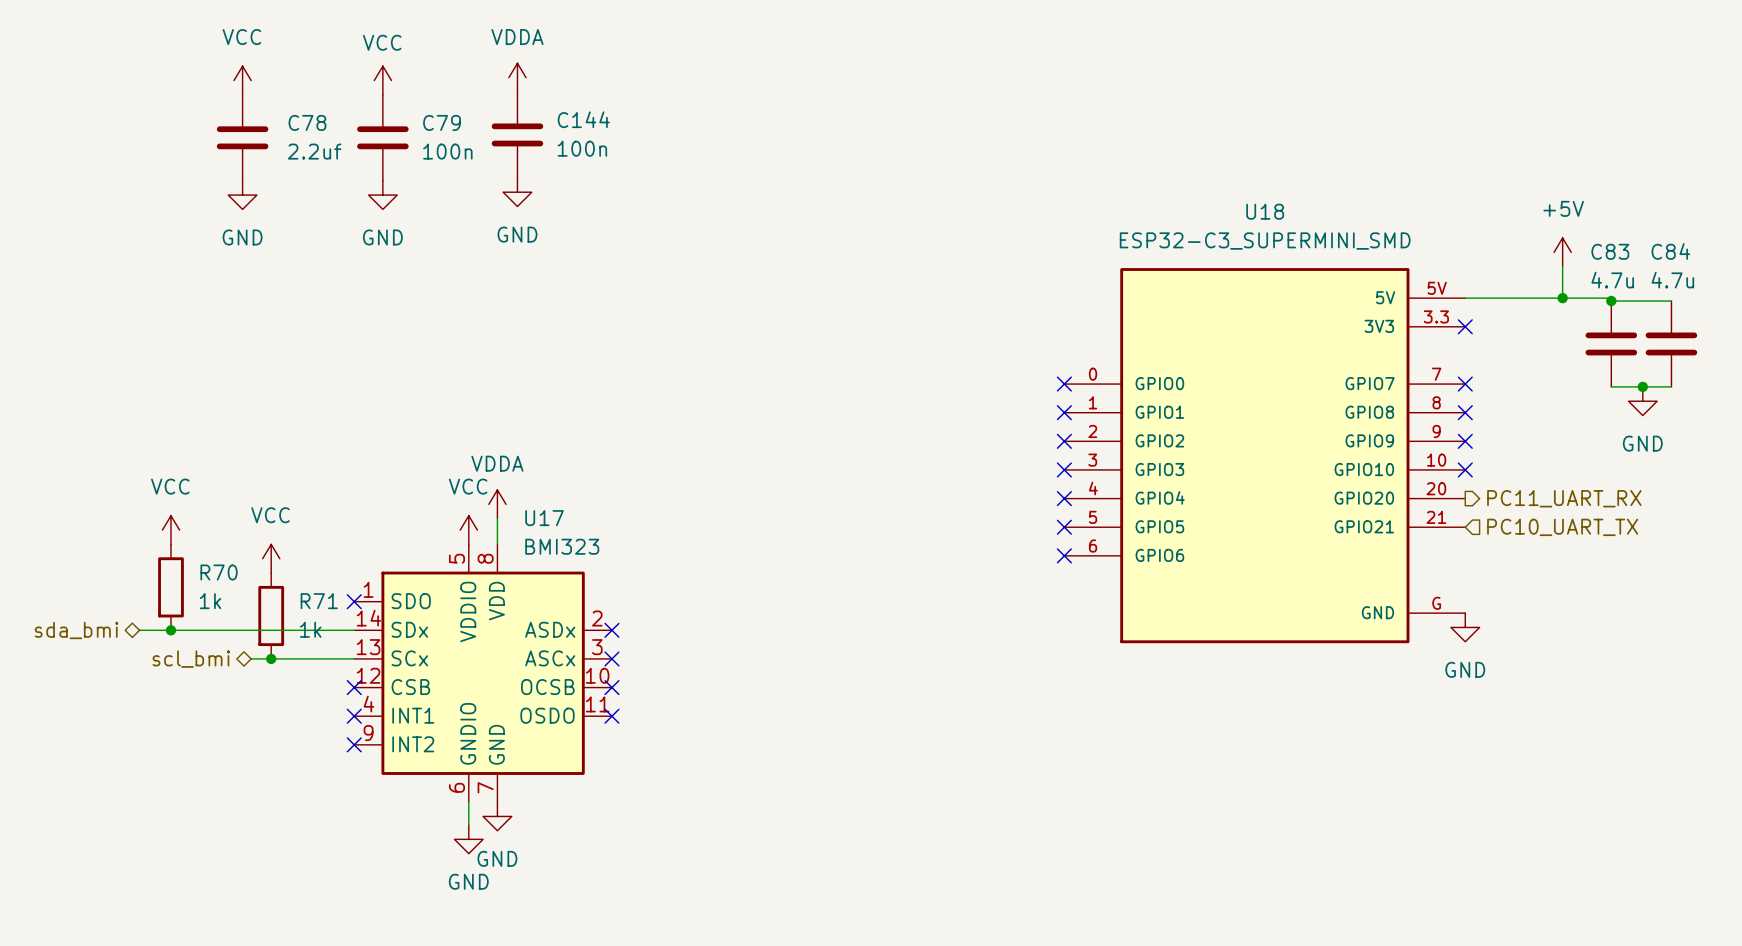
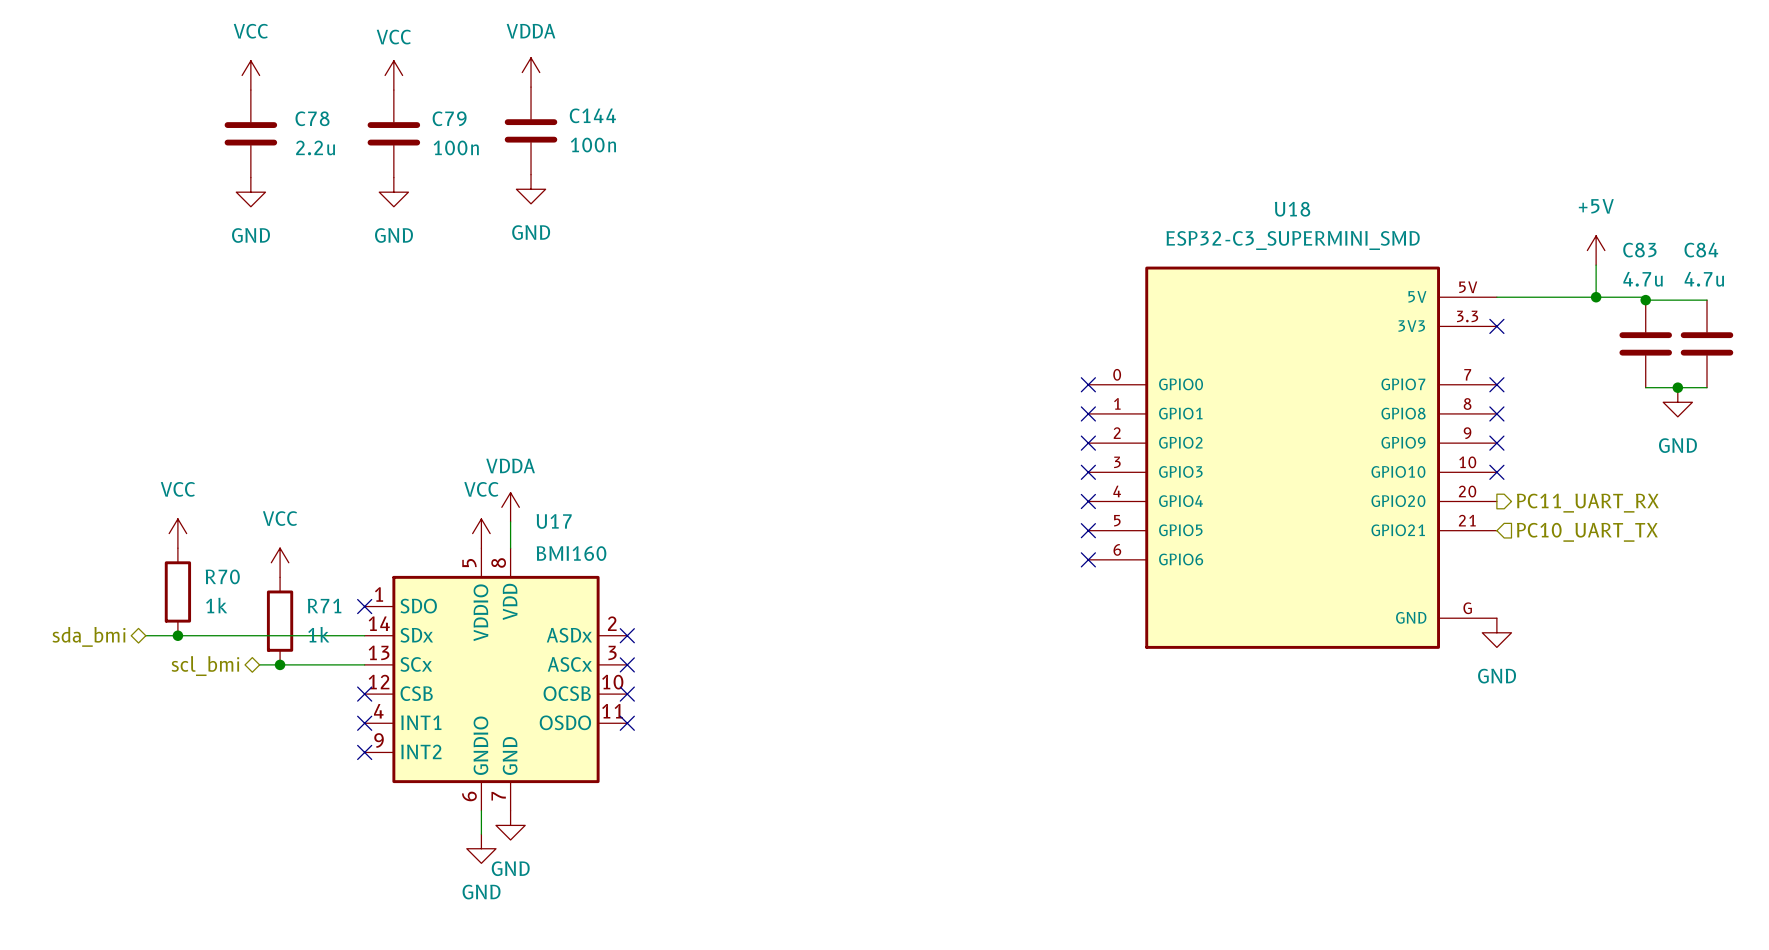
C78 value: 2.2uf (314, 151) -> 2.2u (315, 147)
U17 value: BMI323 (562, 546) -> BMI160 (571, 553)

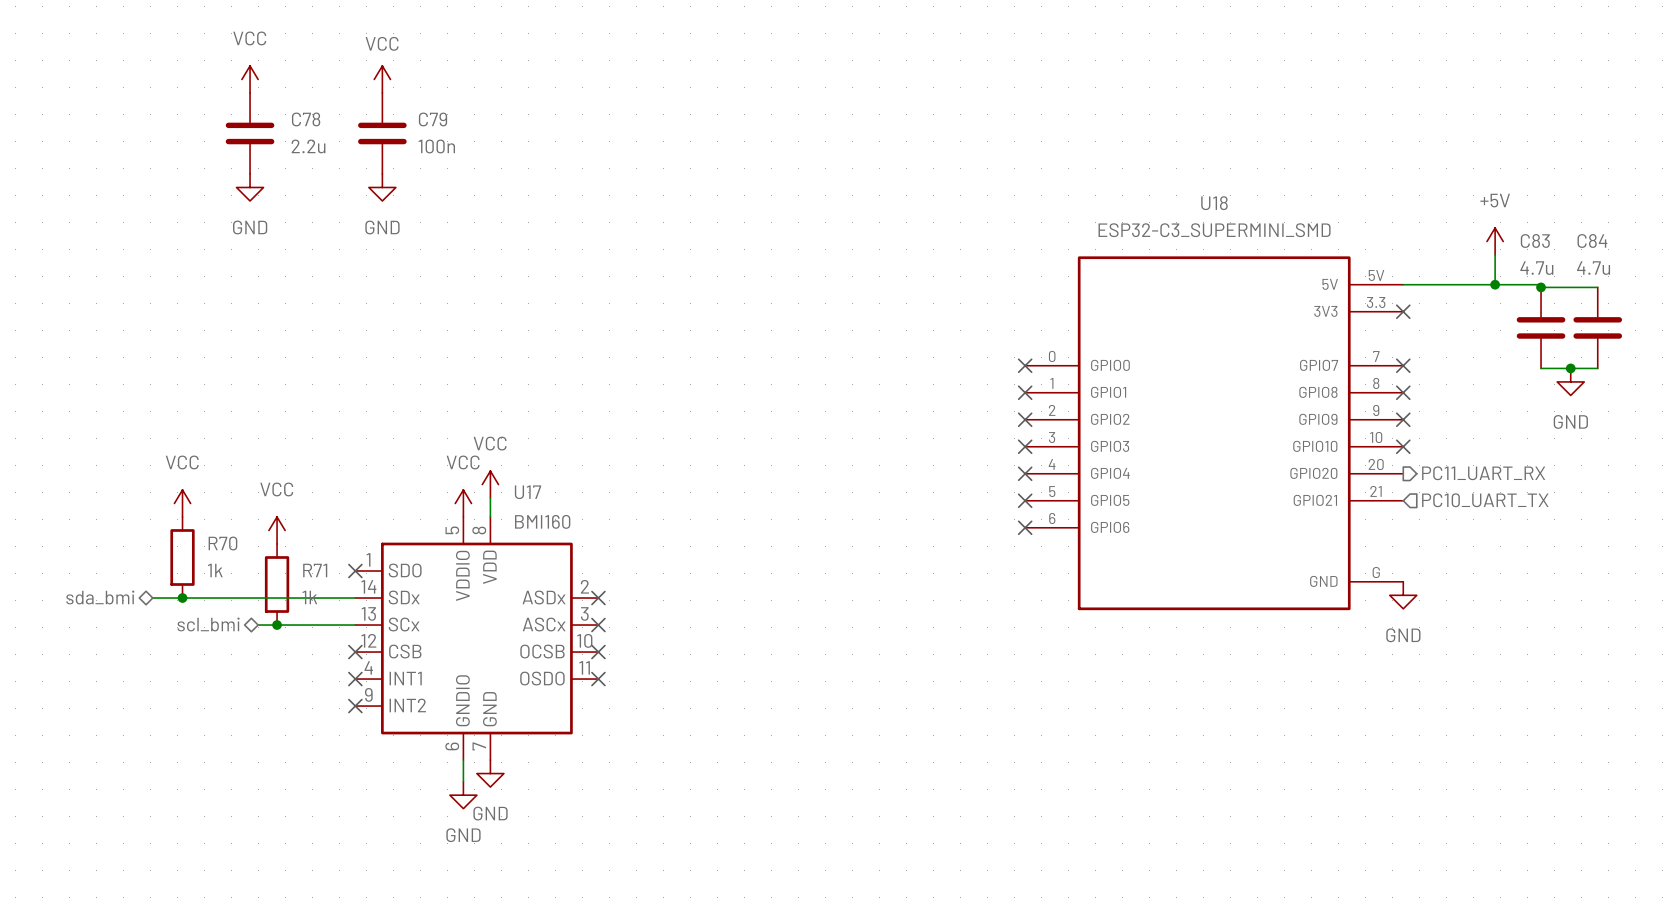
power symbol: VDDA (531, 72) -> none
C144: 100n (531, 130) -> none
power symbol: GND (531, 189) -> none
power symbol: VDDA (510, 507) -> VCC (490, 484)

